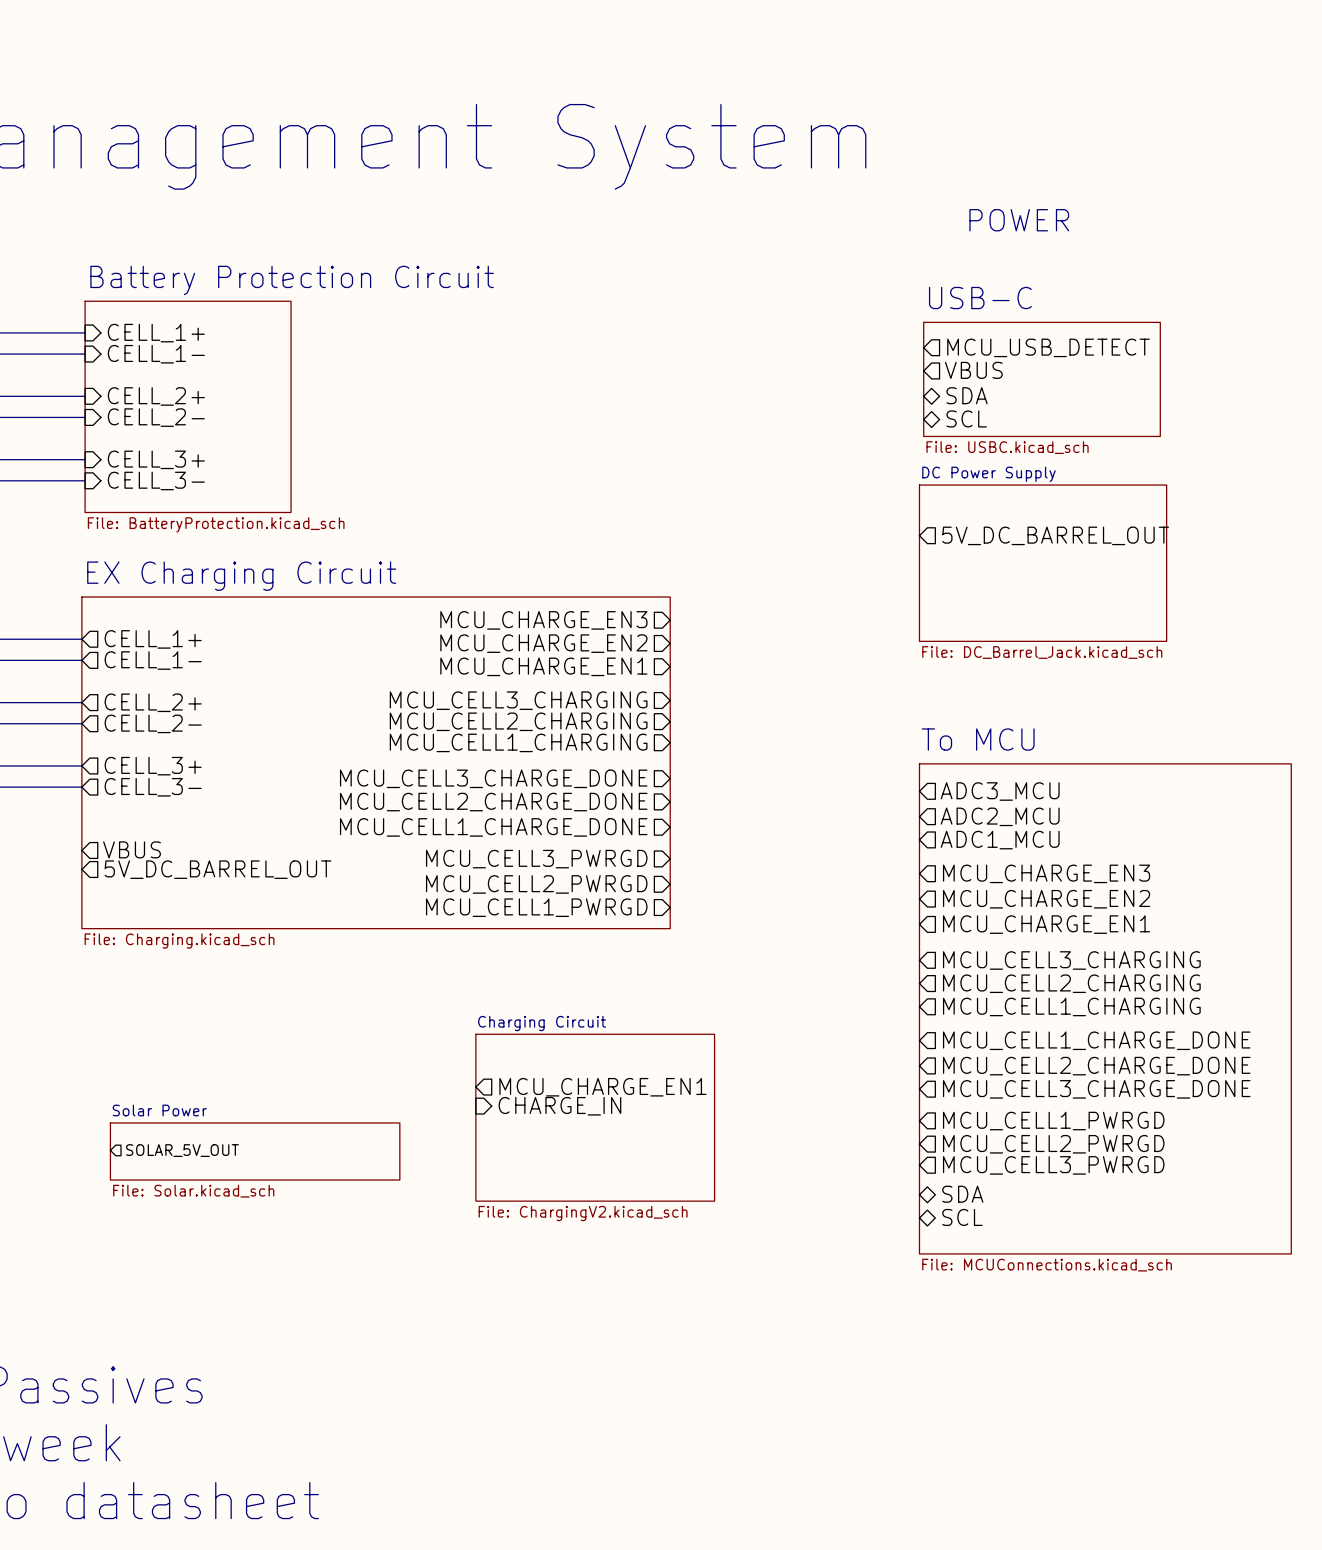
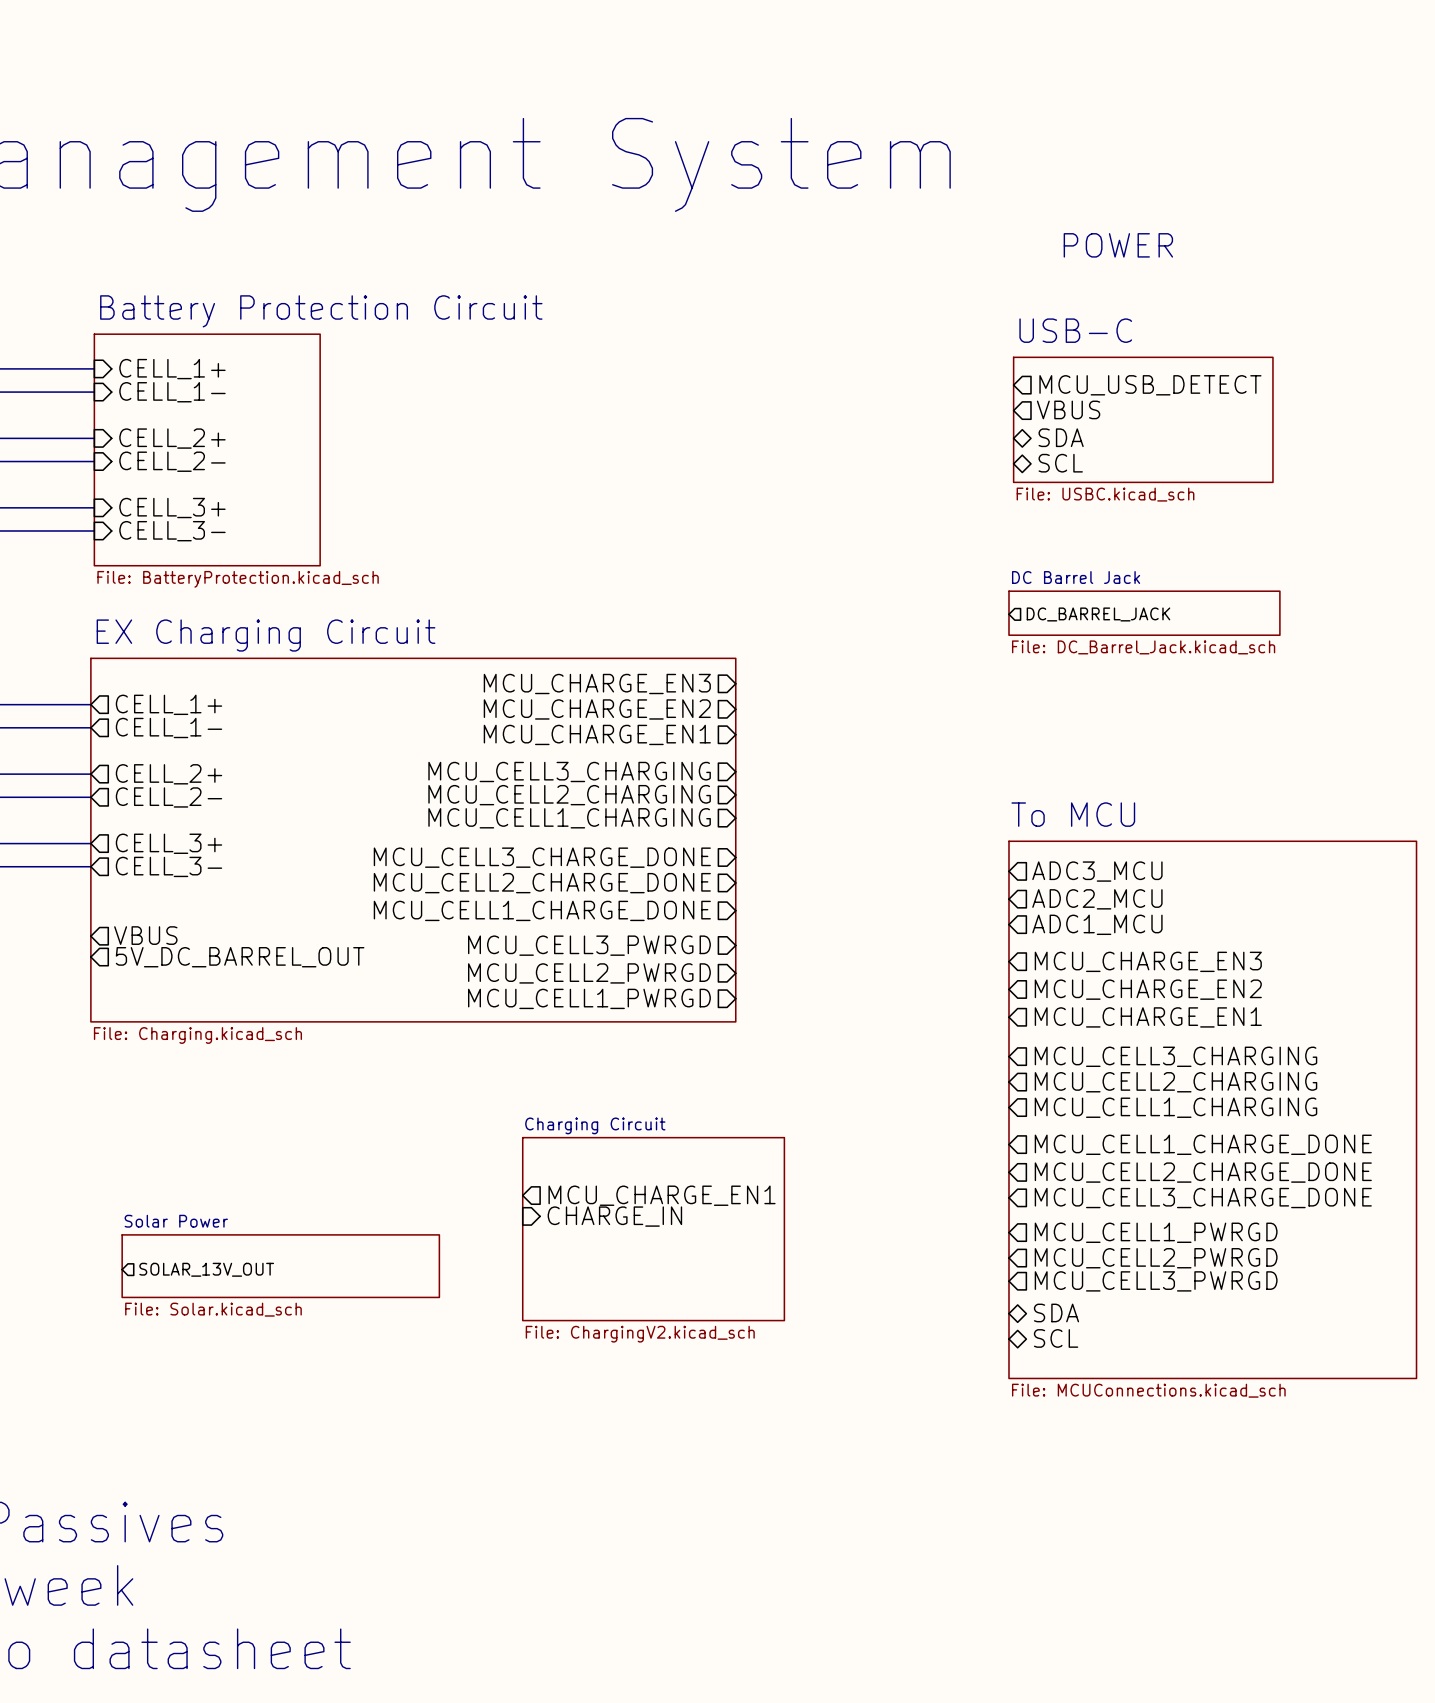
sheet pin: 5V_DC_BARREL_OUT (1055, 535) -> DC_BARREL_JACK (1098, 614)
sheet DC Barrel Jack: none -> File: DC_Barrel_Jack.kicad_sch (1144, 613)
sheet DC Power Supply: File: DC_Barrel_Jack.kicad_sch (1043, 563) -> none
sheet pin: SOLAR_5V_OUT (182, 1150) -> SOLAR_13V_OUT (206, 1269)

